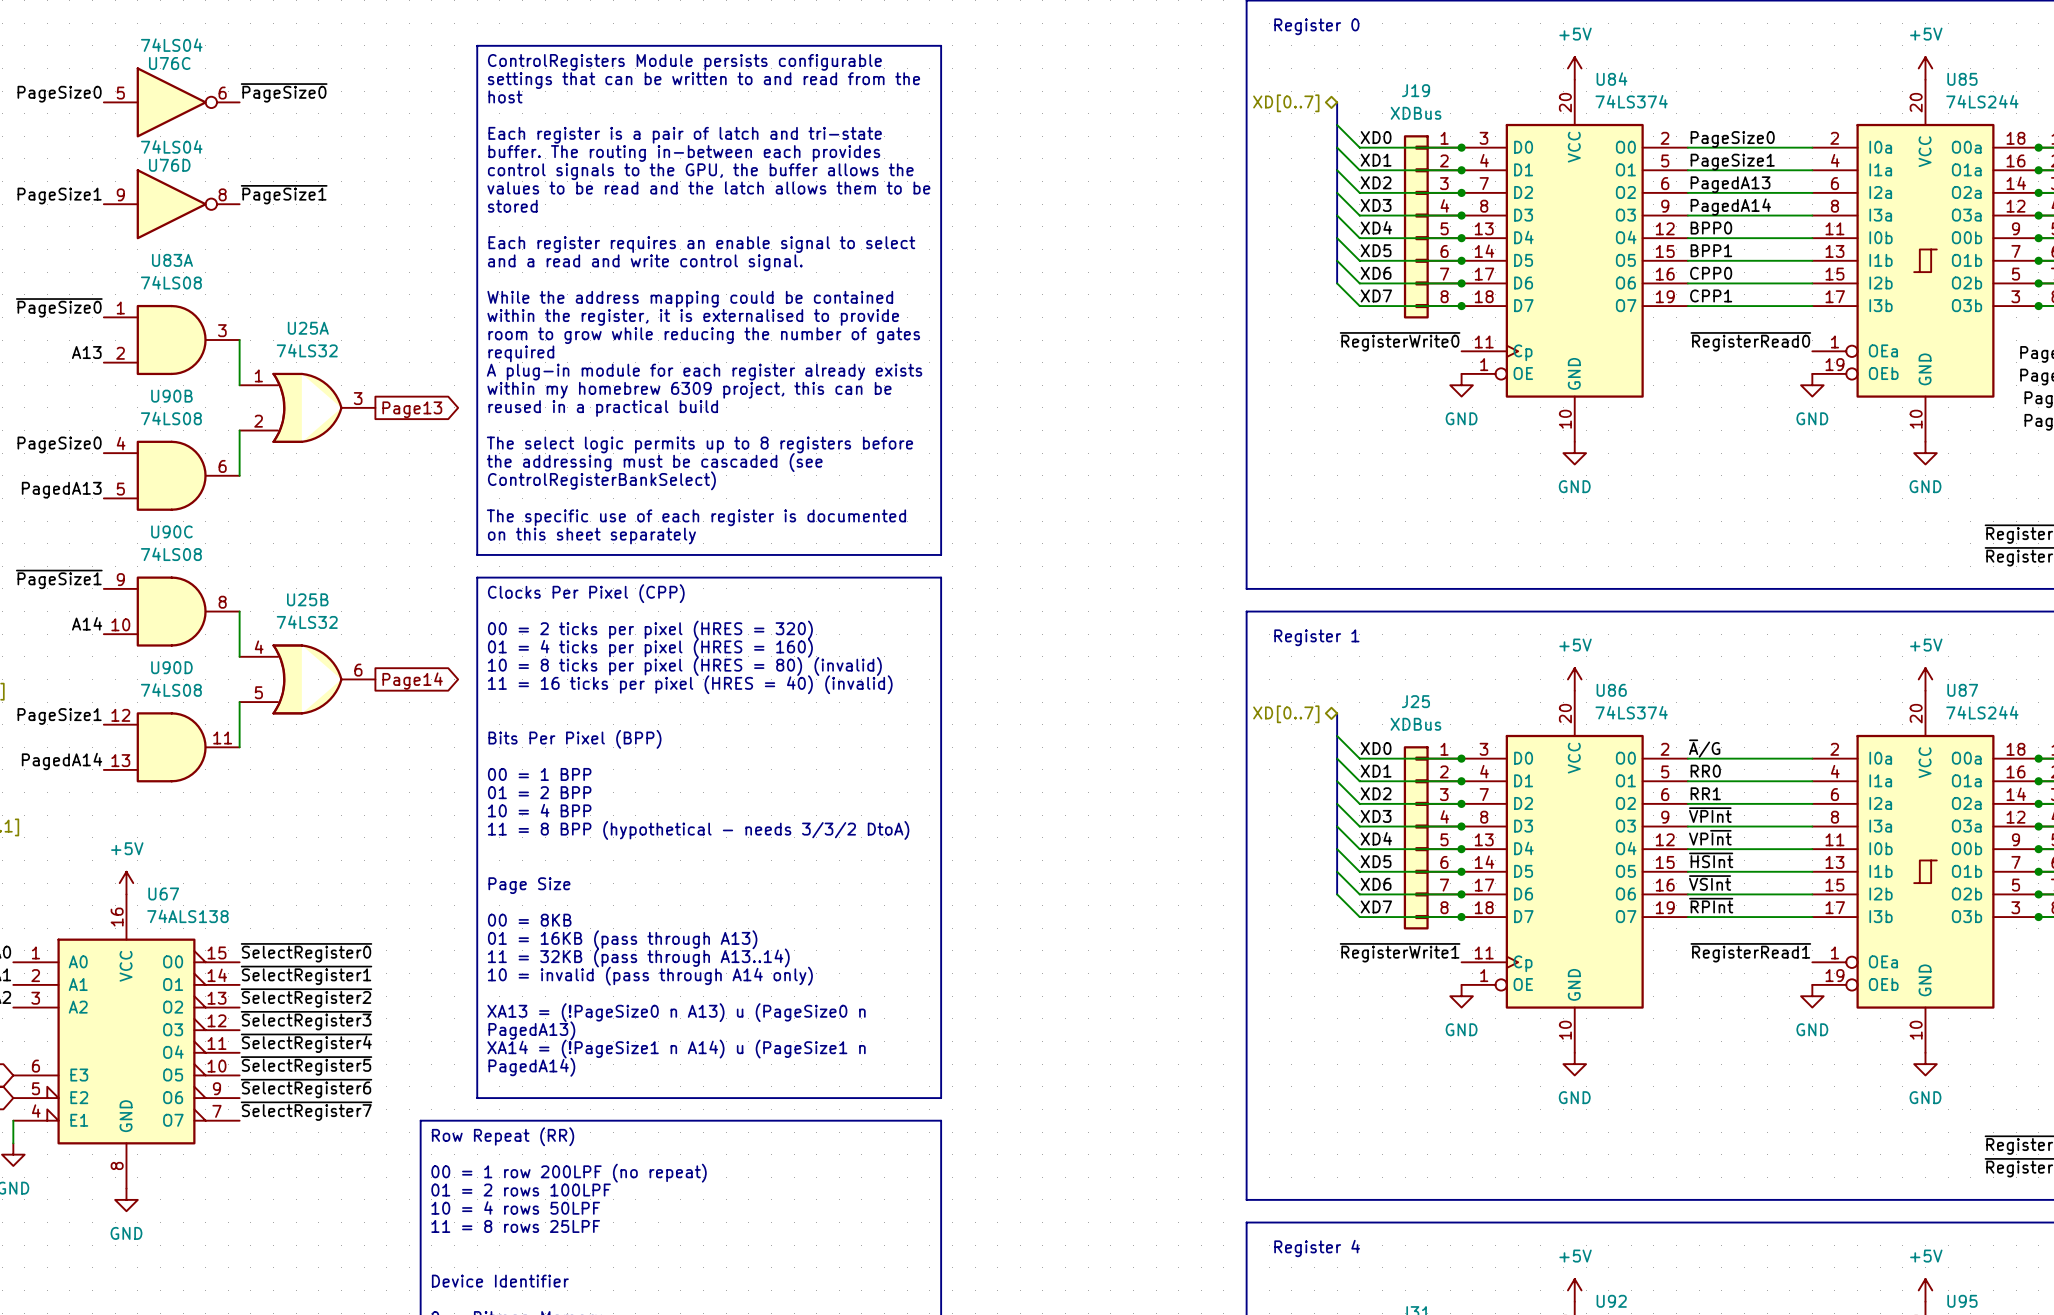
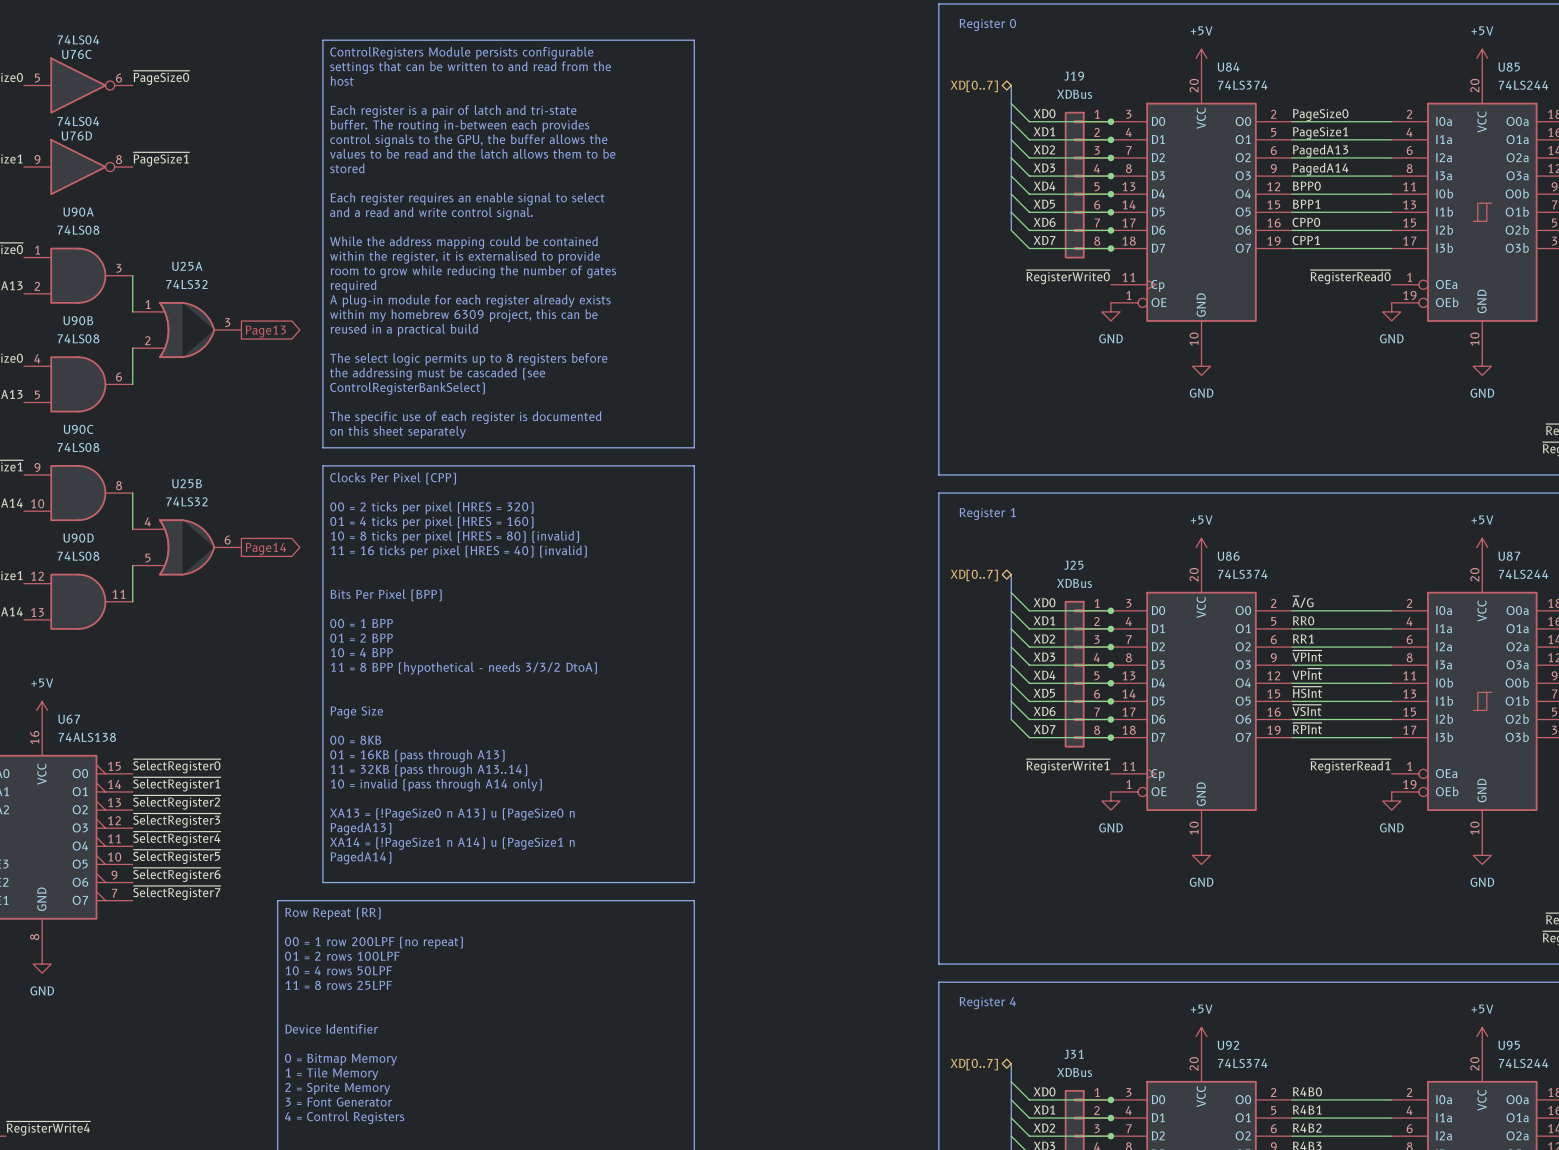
U83A name: U83A (172, 260) -> U90A (78, 212)

